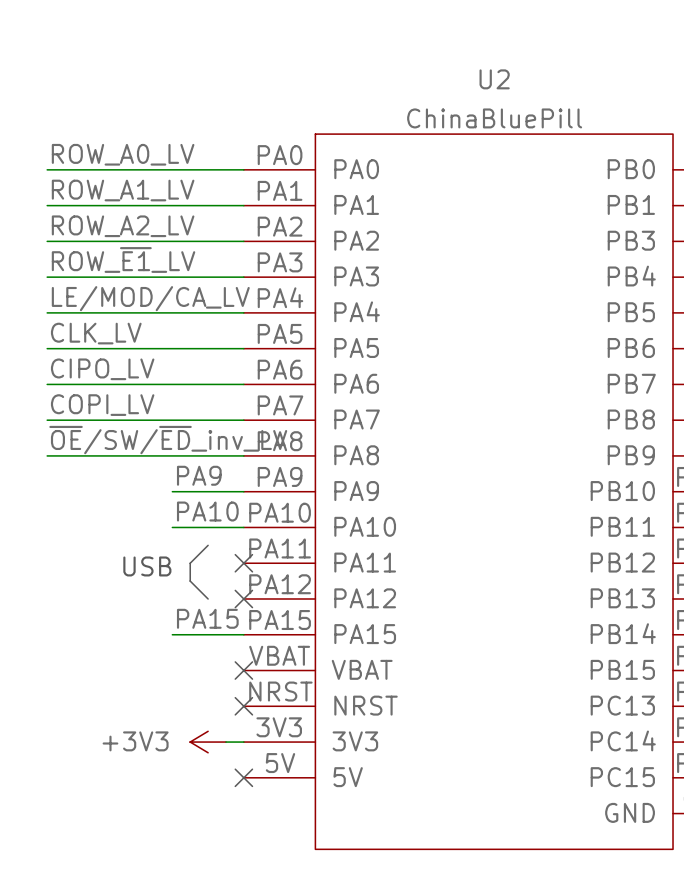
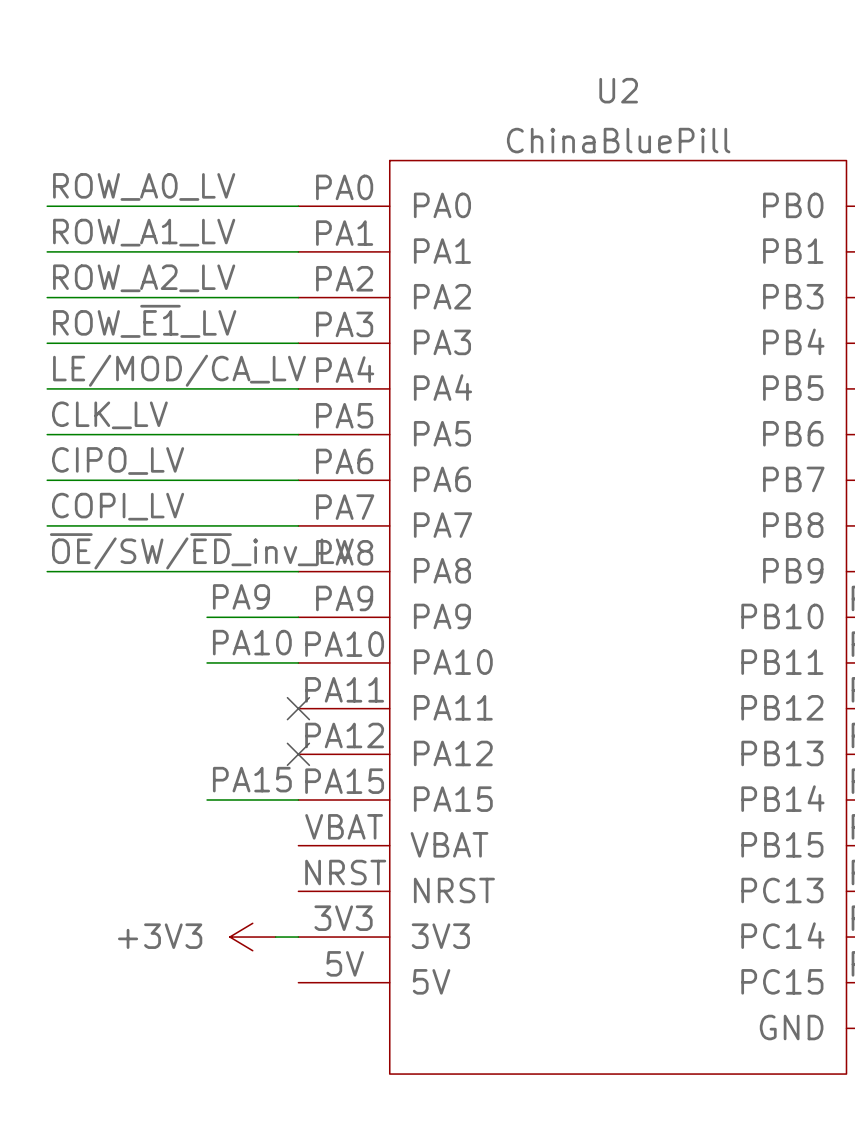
line: (208, 545) (190, 563) (190, 581) (208, 598) -> none
text: USB (147, 566) -> none
no-connect mark: (243, 670) -> none
no-connect mark: (243, 706) -> none
no-connect mark: (243, 777) -> none

